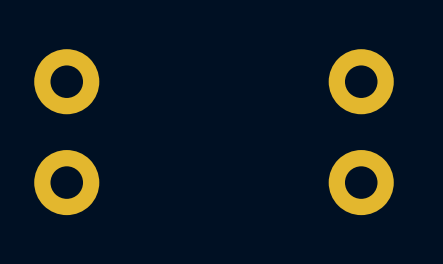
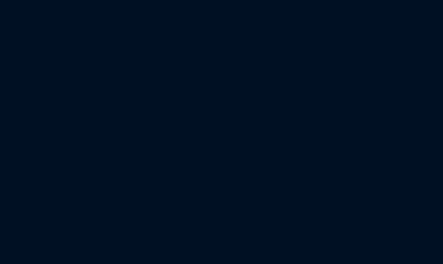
part: (66, 132) -> none
part: (361, 132) -> none

